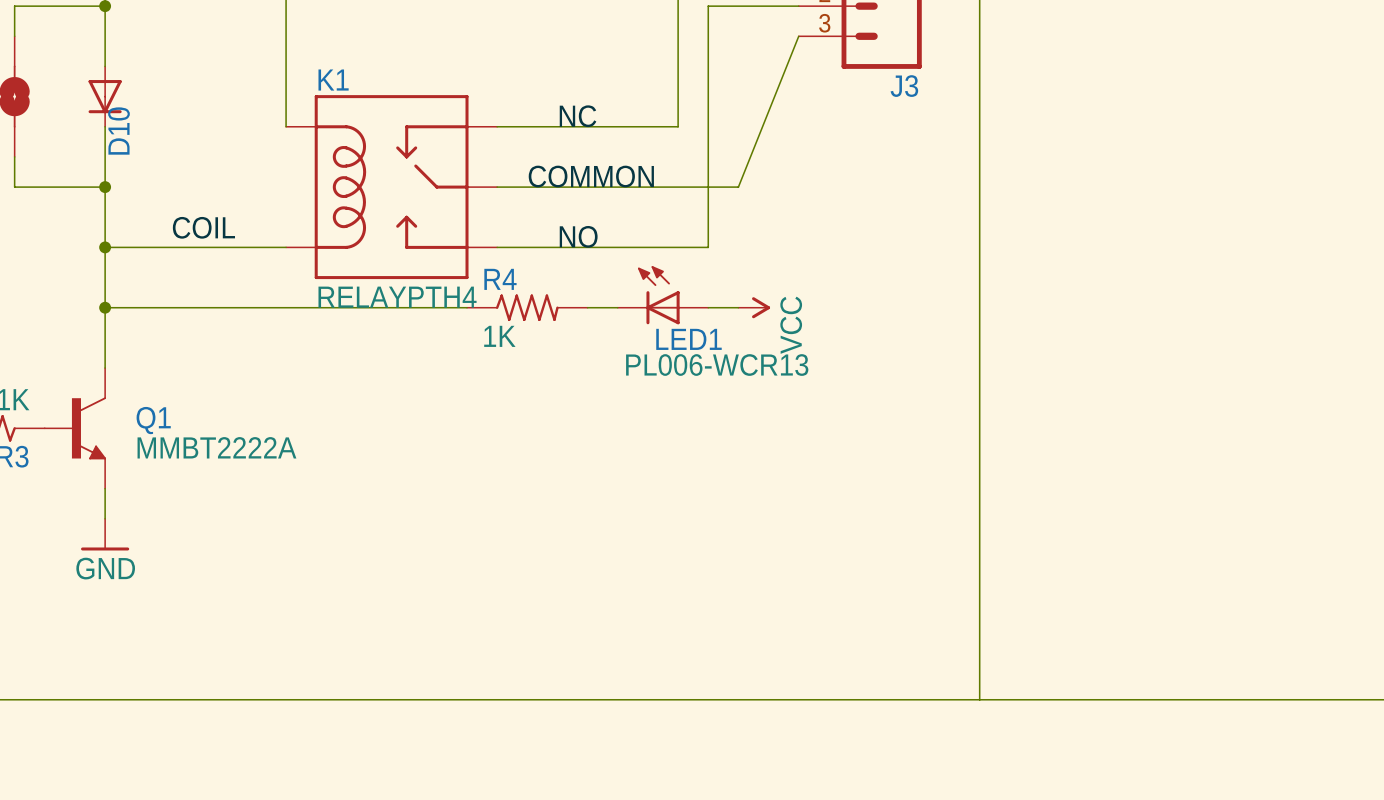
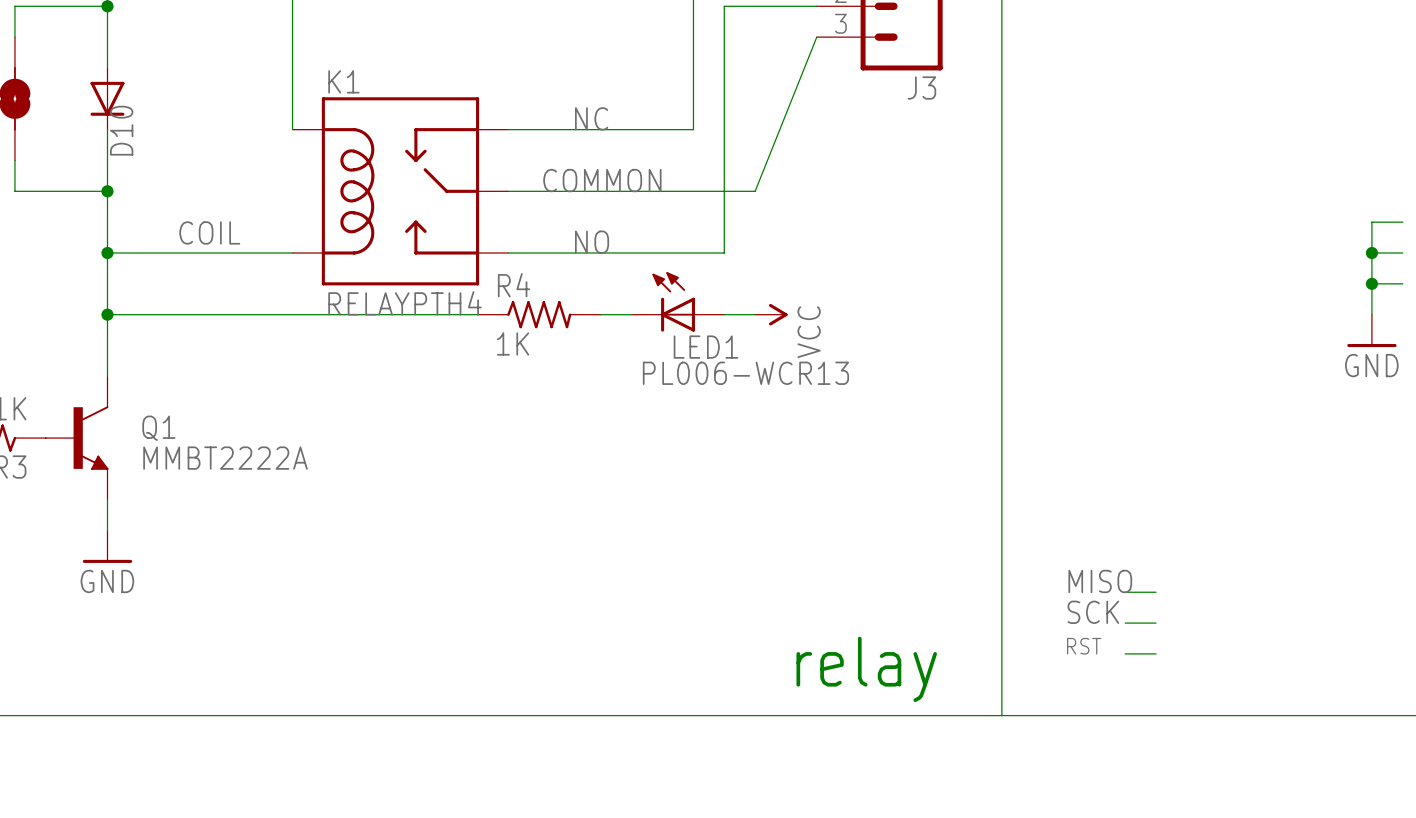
wire: none -> (1402, 222) (1371, 222) (1371, 314)
wire: none -> (1371, 253) (1402, 253)
junction: none -> (1371, 253)
wire: none -> (1371, 283) (1402, 283)
junction: none -> (1371, 283)
power symbol: none -> GND (1371, 330)
label: none -> MISO (1100, 581)
wire: none -> (1125, 592) (1156, 592)
label: none -> SCK (1093, 612)
wire: none -> (1125, 623) (1156, 623)
label: none -> RST (1084, 646)
wire: none -> (1125, 653) (1156, 653)
text: none -> relay (866, 669)

